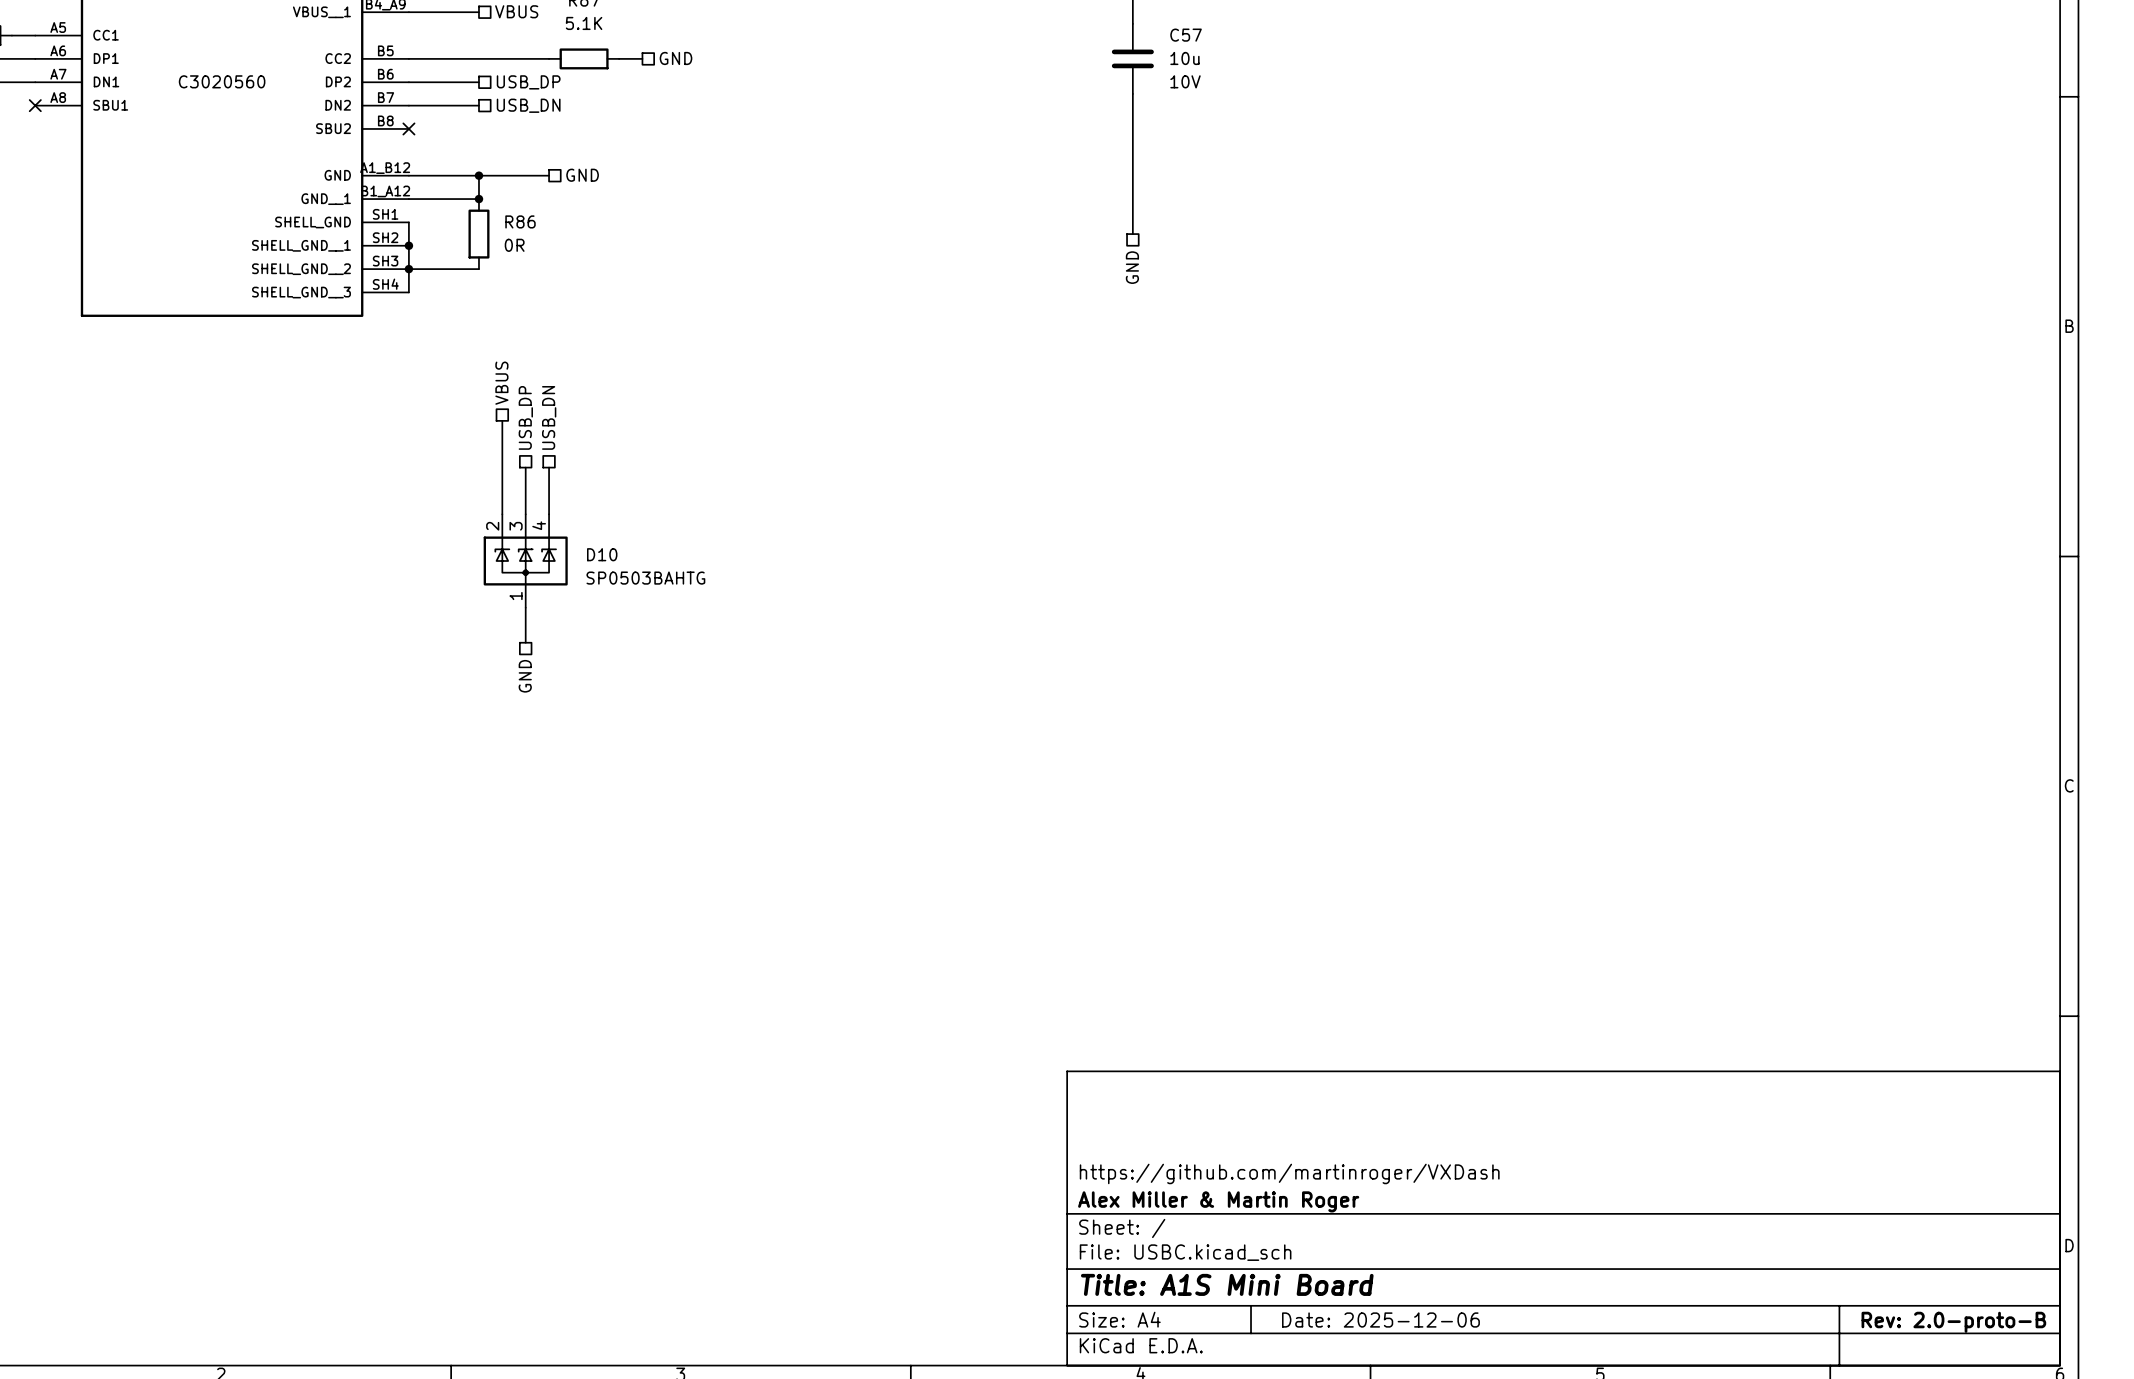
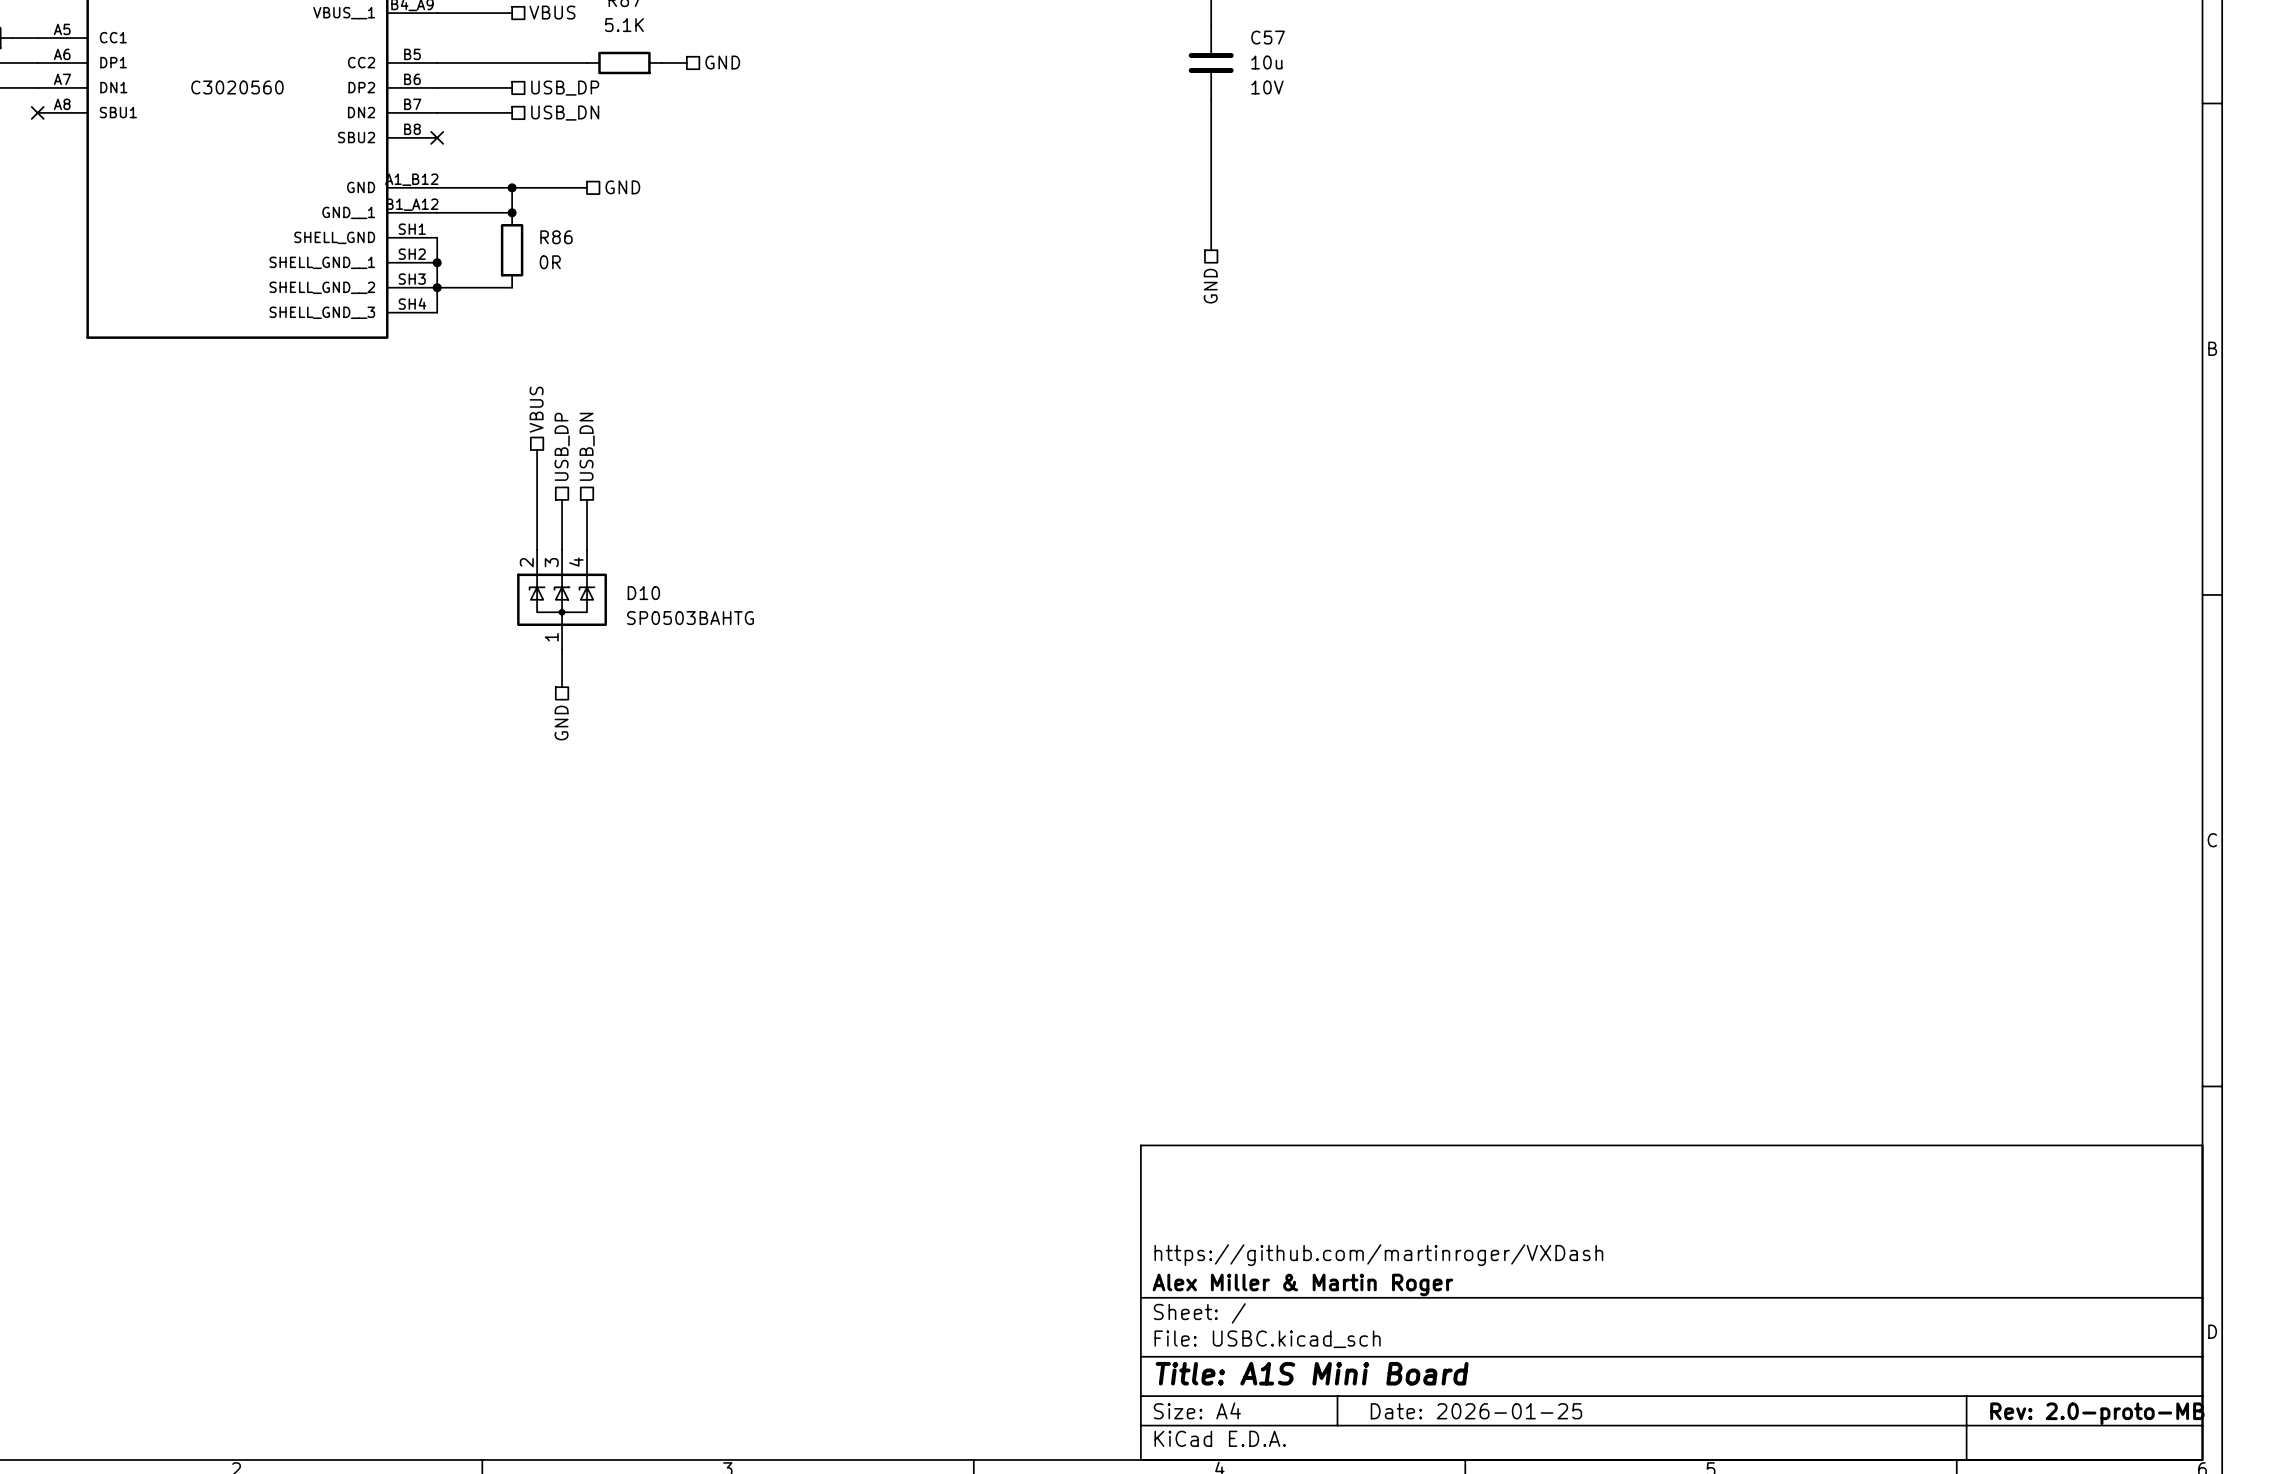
title block: Date: 2025-12-06 (1380, 1320) -> Date: 2026-01-25 (1476, 1411)
title block: Rev: 2.0-proto-B (1953, 1322) -> Rev: 2.0-proto-MB (2097, 1413)

